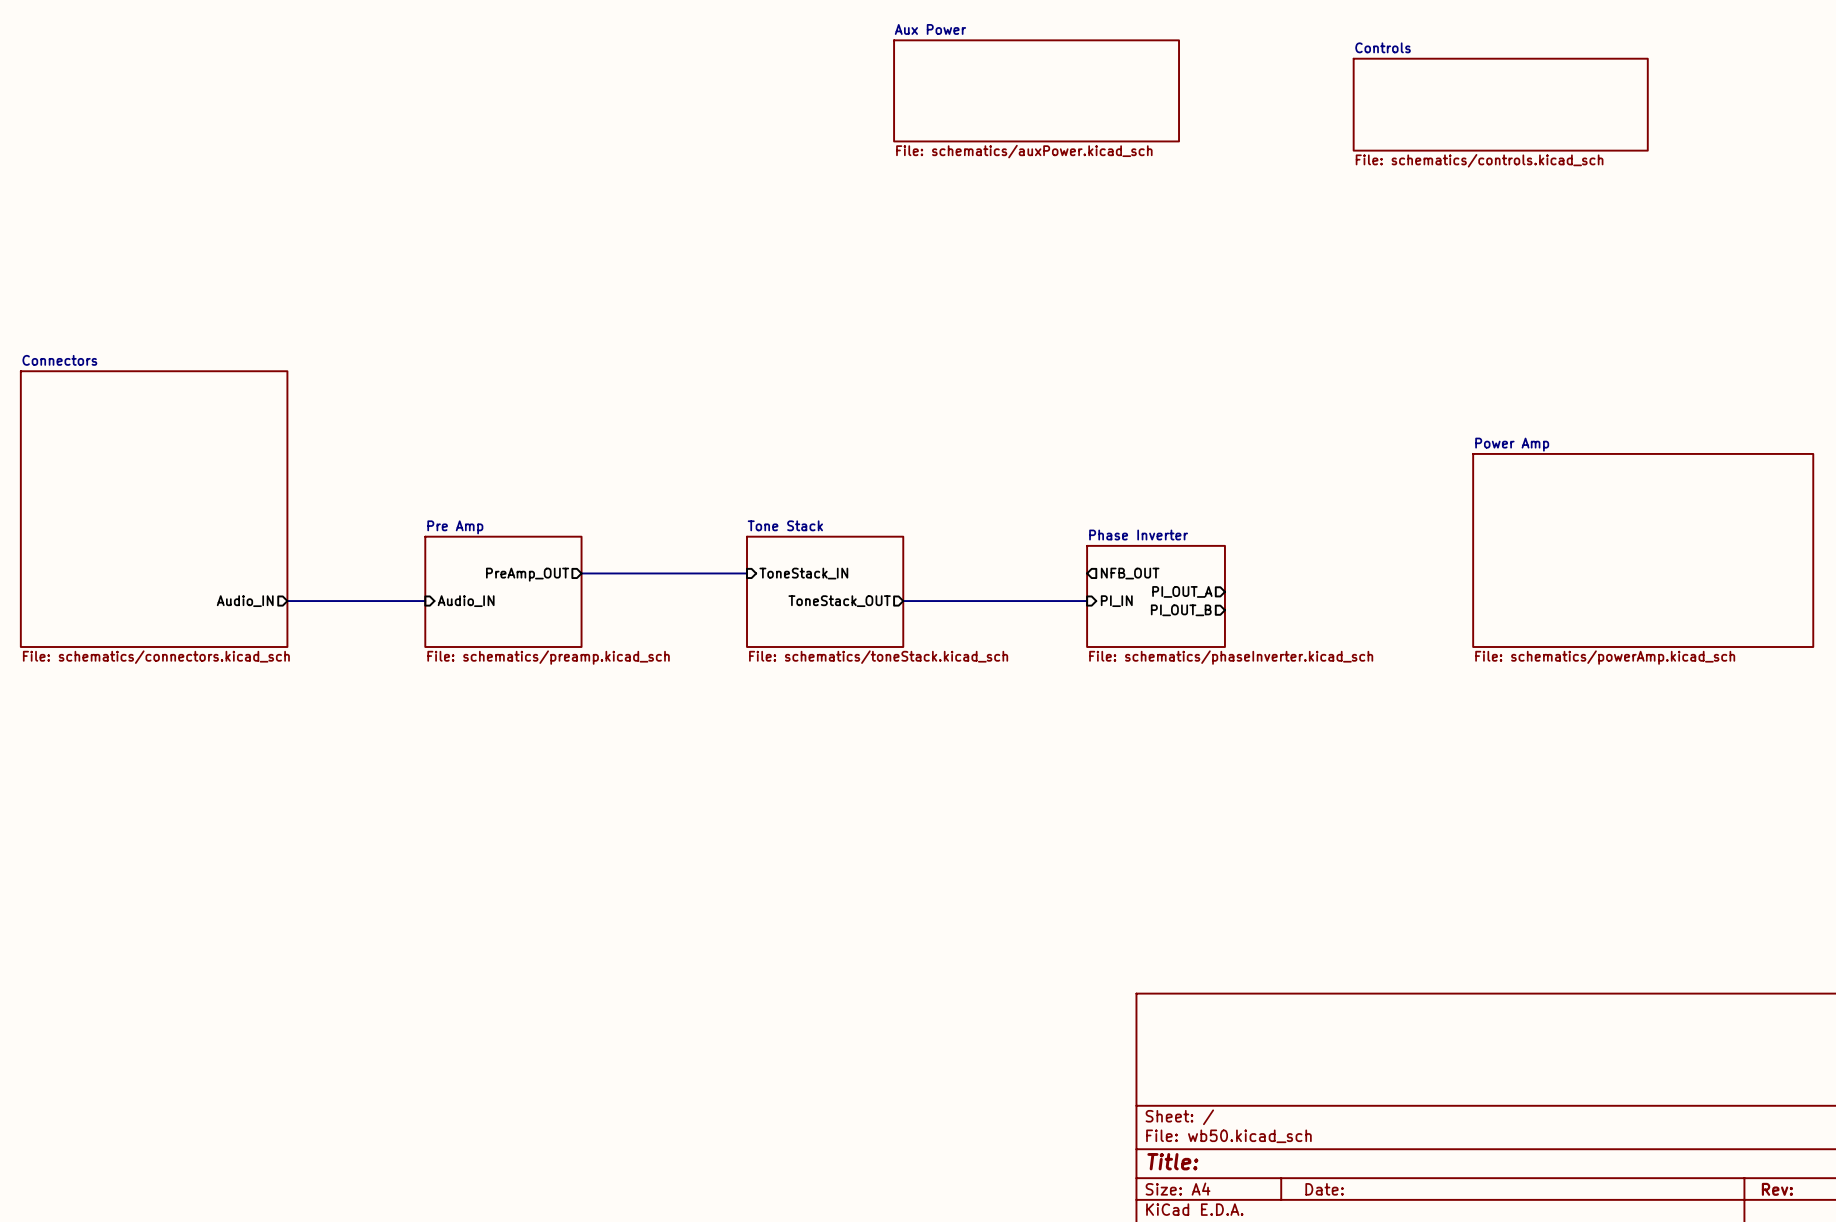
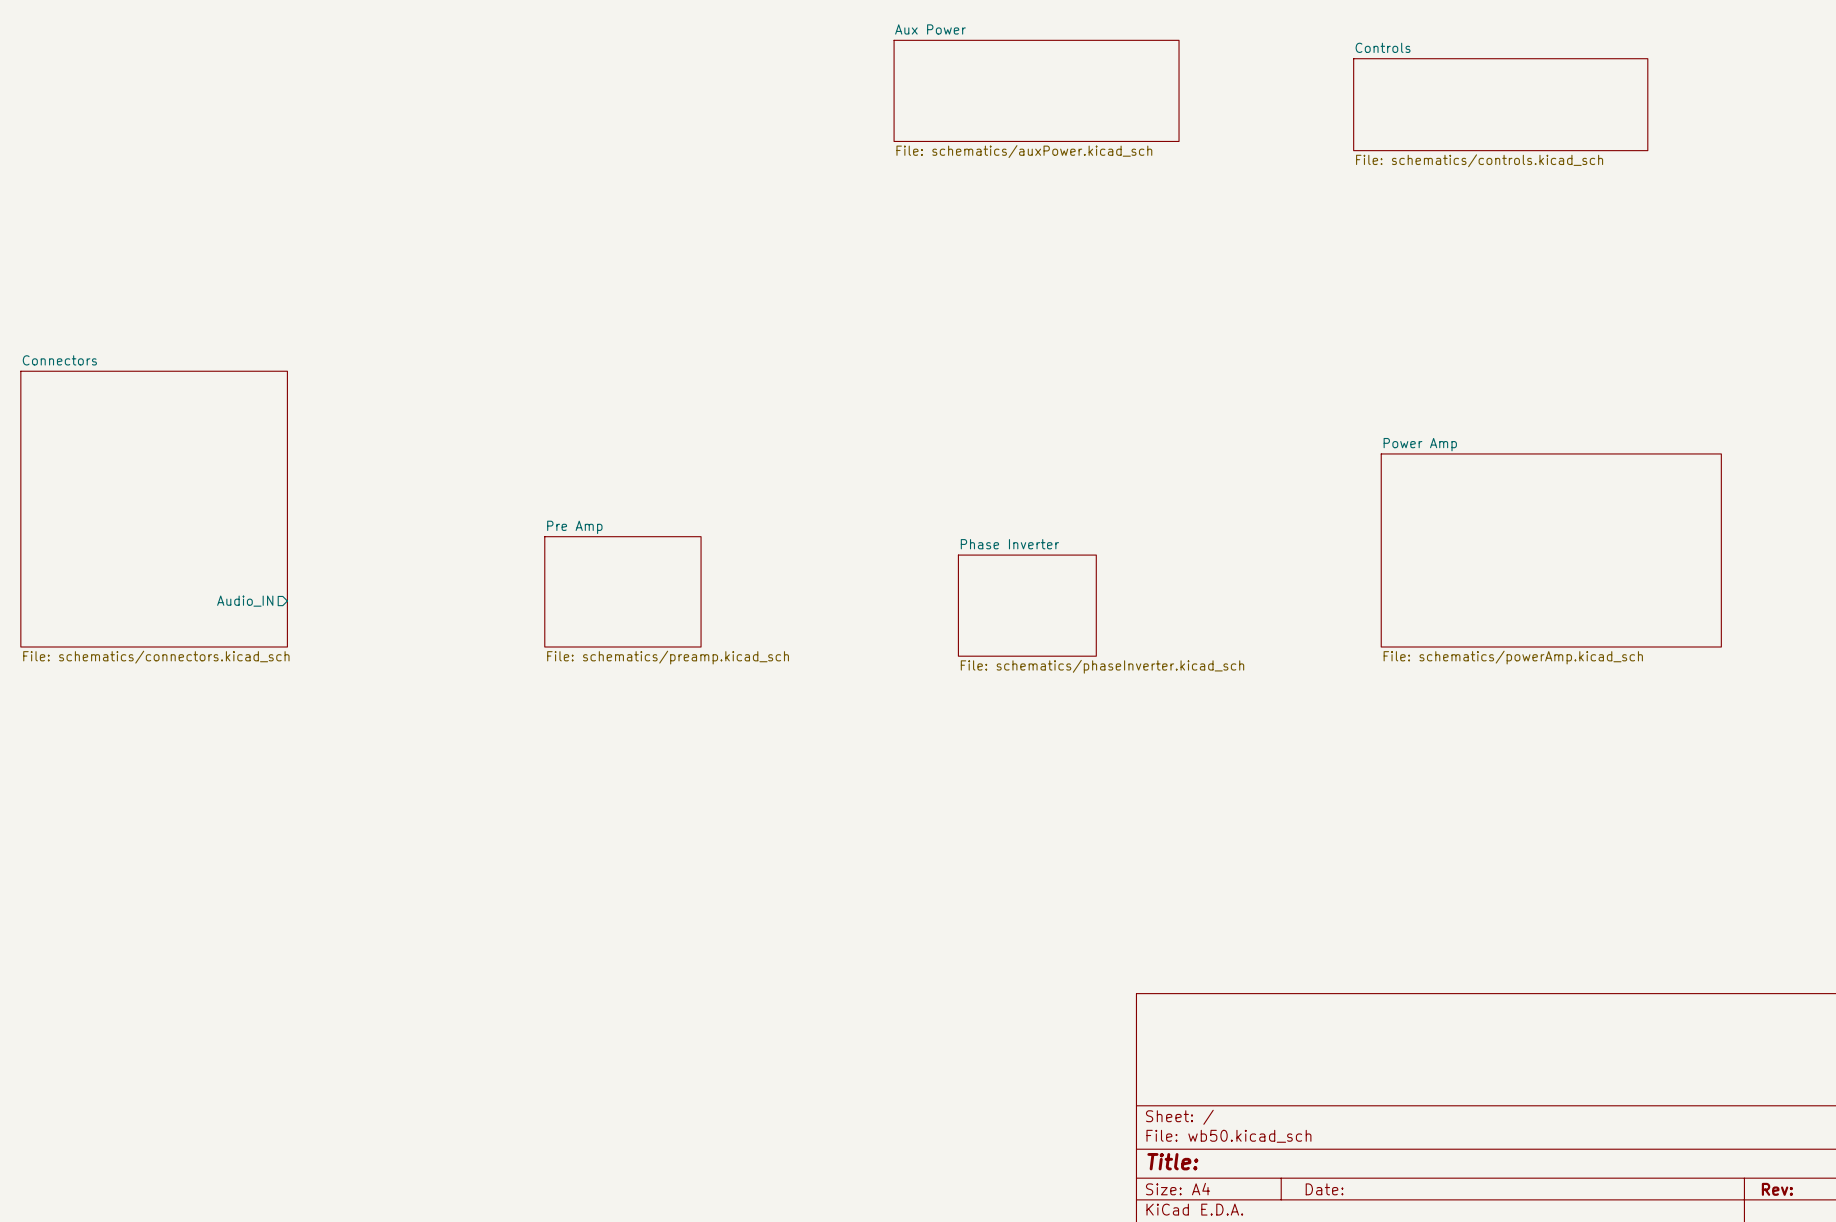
sheet Power Amp position: (1643, 550) -> (1551, 550)
wire: (581, 573) (747, 573) -> none
sheet pin: ToneStack_IN (803, 573) -> none
sheet pin: NFB_OUT (1130, 573) -> none
sheet pin: PreAmp_OUT (527, 574) -> none
sheet Pre Amp position: (503, 591) -> (622, 591)
sheet Tone Stack: File: schematics/toneStack.kicad_sch (825, 591) -> none
sheet pin: PI_OUT_A (1182, 591) -> none
sheet Phase Inverter position: (1156, 596) -> (1027, 605)
wire: (287, 601) (425, 601) -> none
sheet pin: Audio_IN (466, 601) -> none
sheet pin: ToneStack_OUT (839, 601) -> none
wire: (903, 601) (1087, 601) -> none
sheet pin: PI_IN (1116, 601) -> none
sheet pin: PI_OUT_B (1181, 610) -> none

